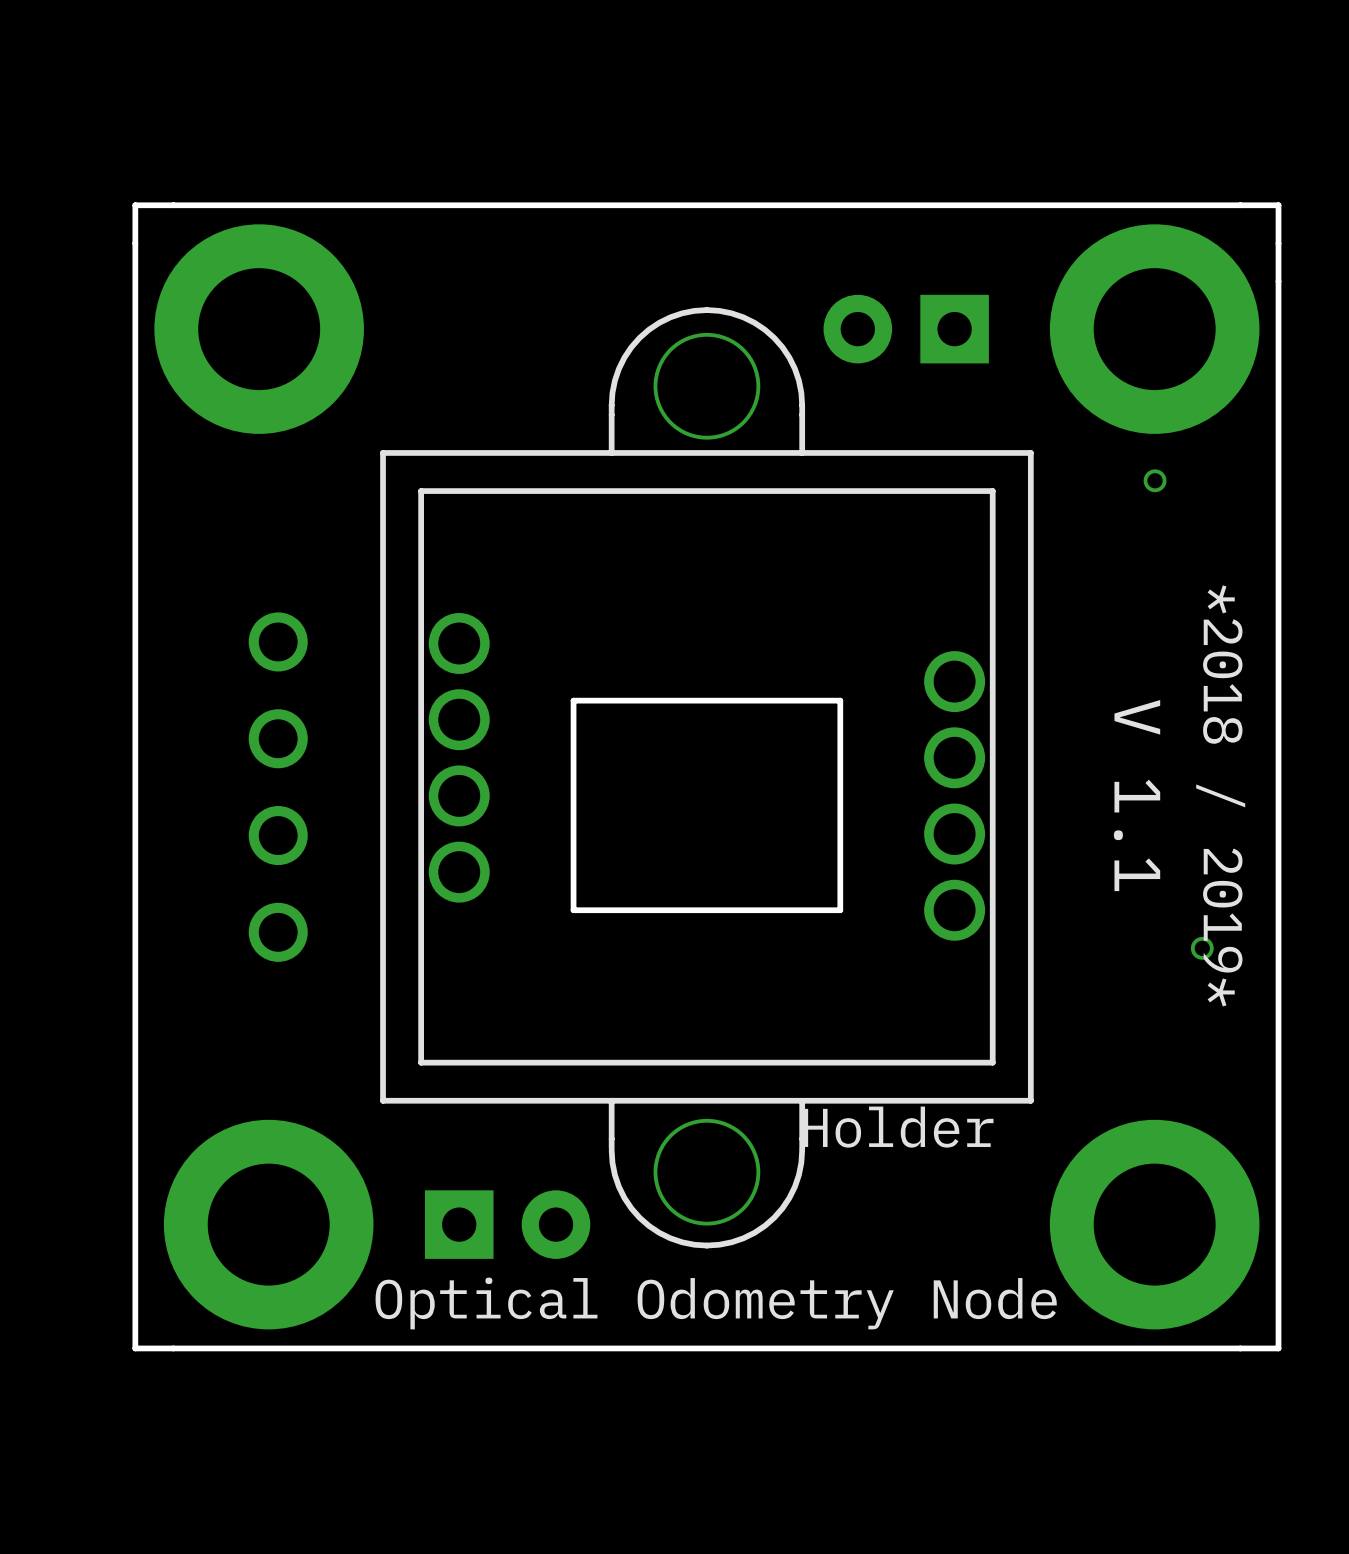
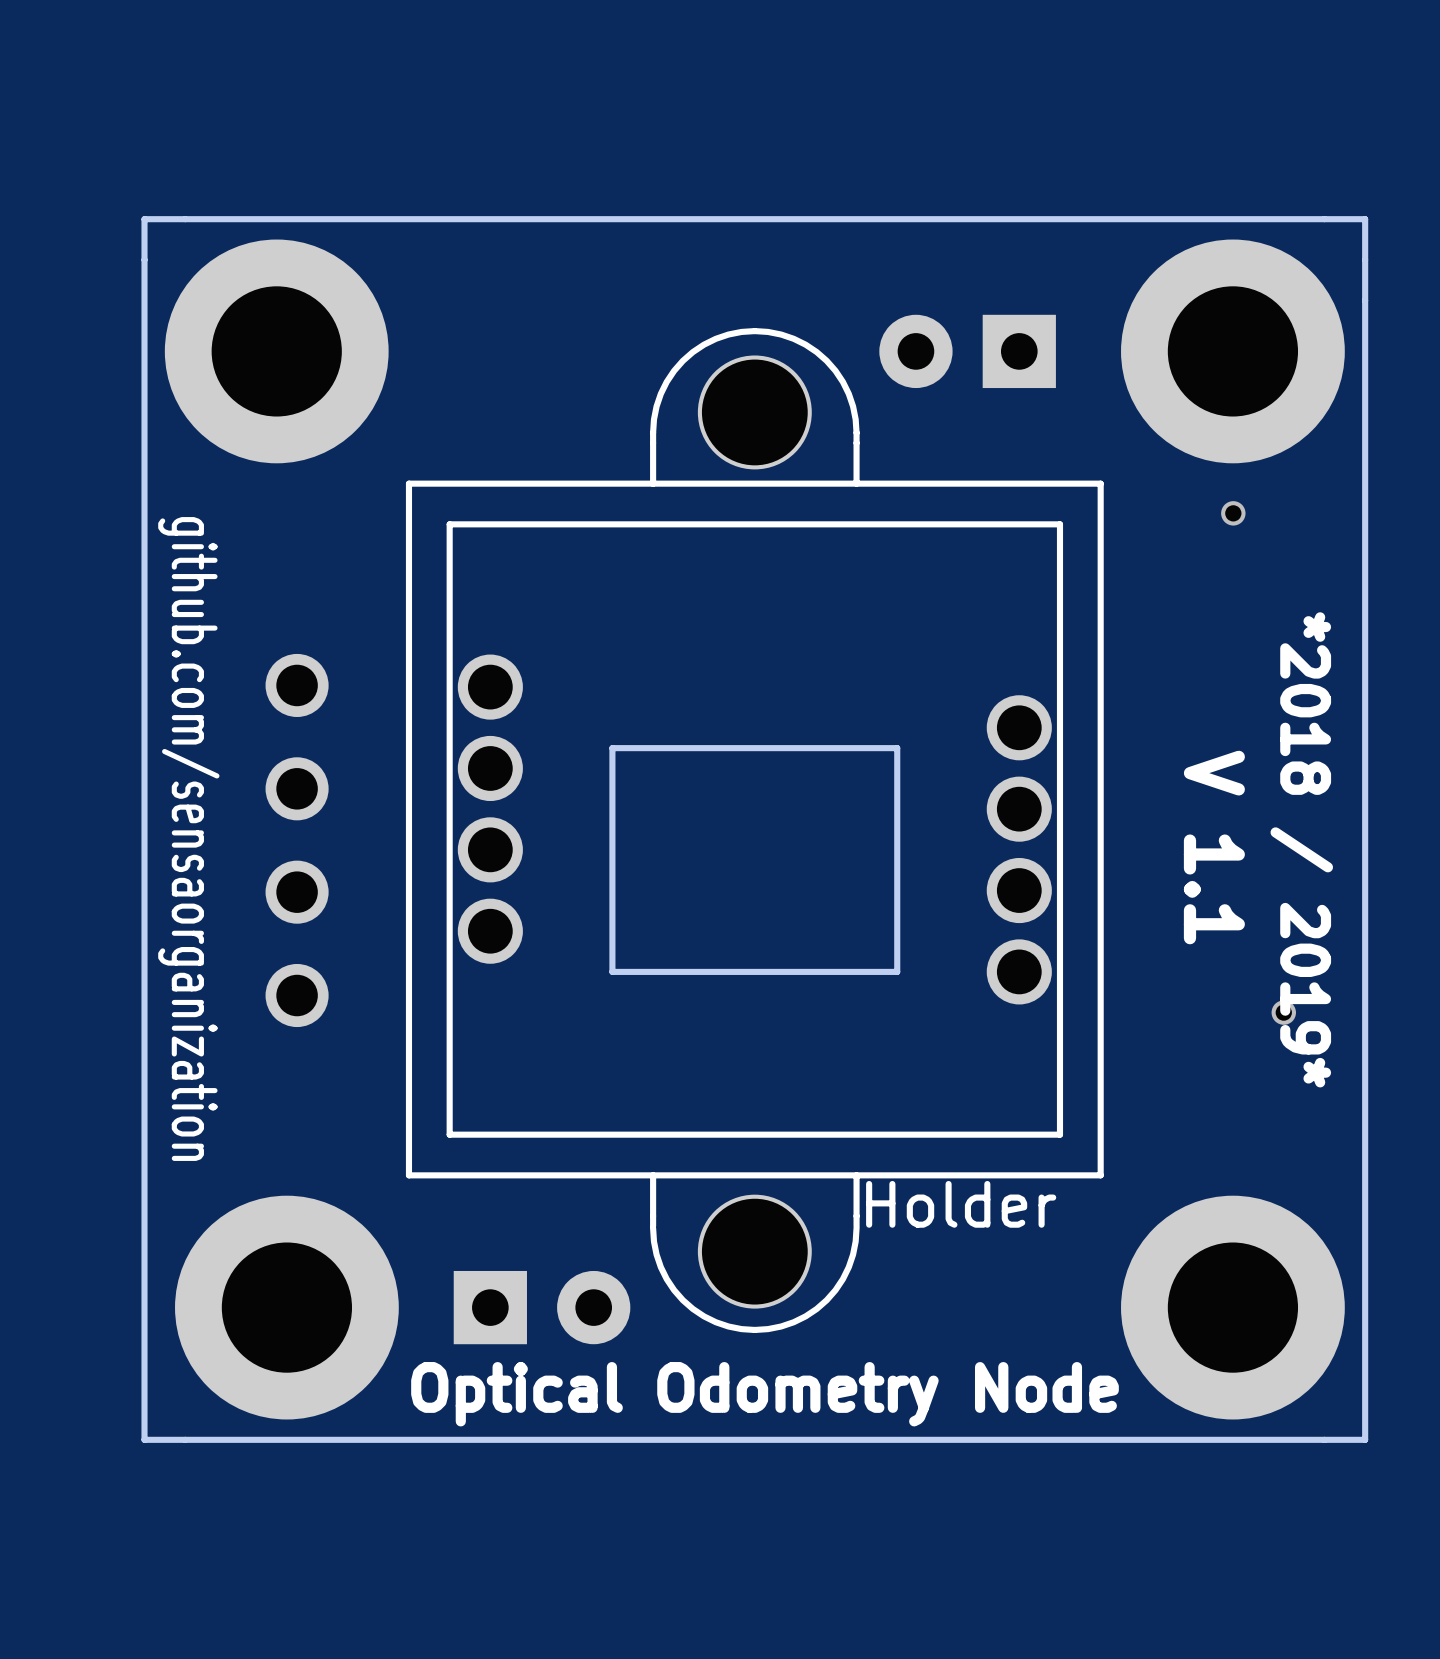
text: none -> github.com/sensaorganization (188, 839)

